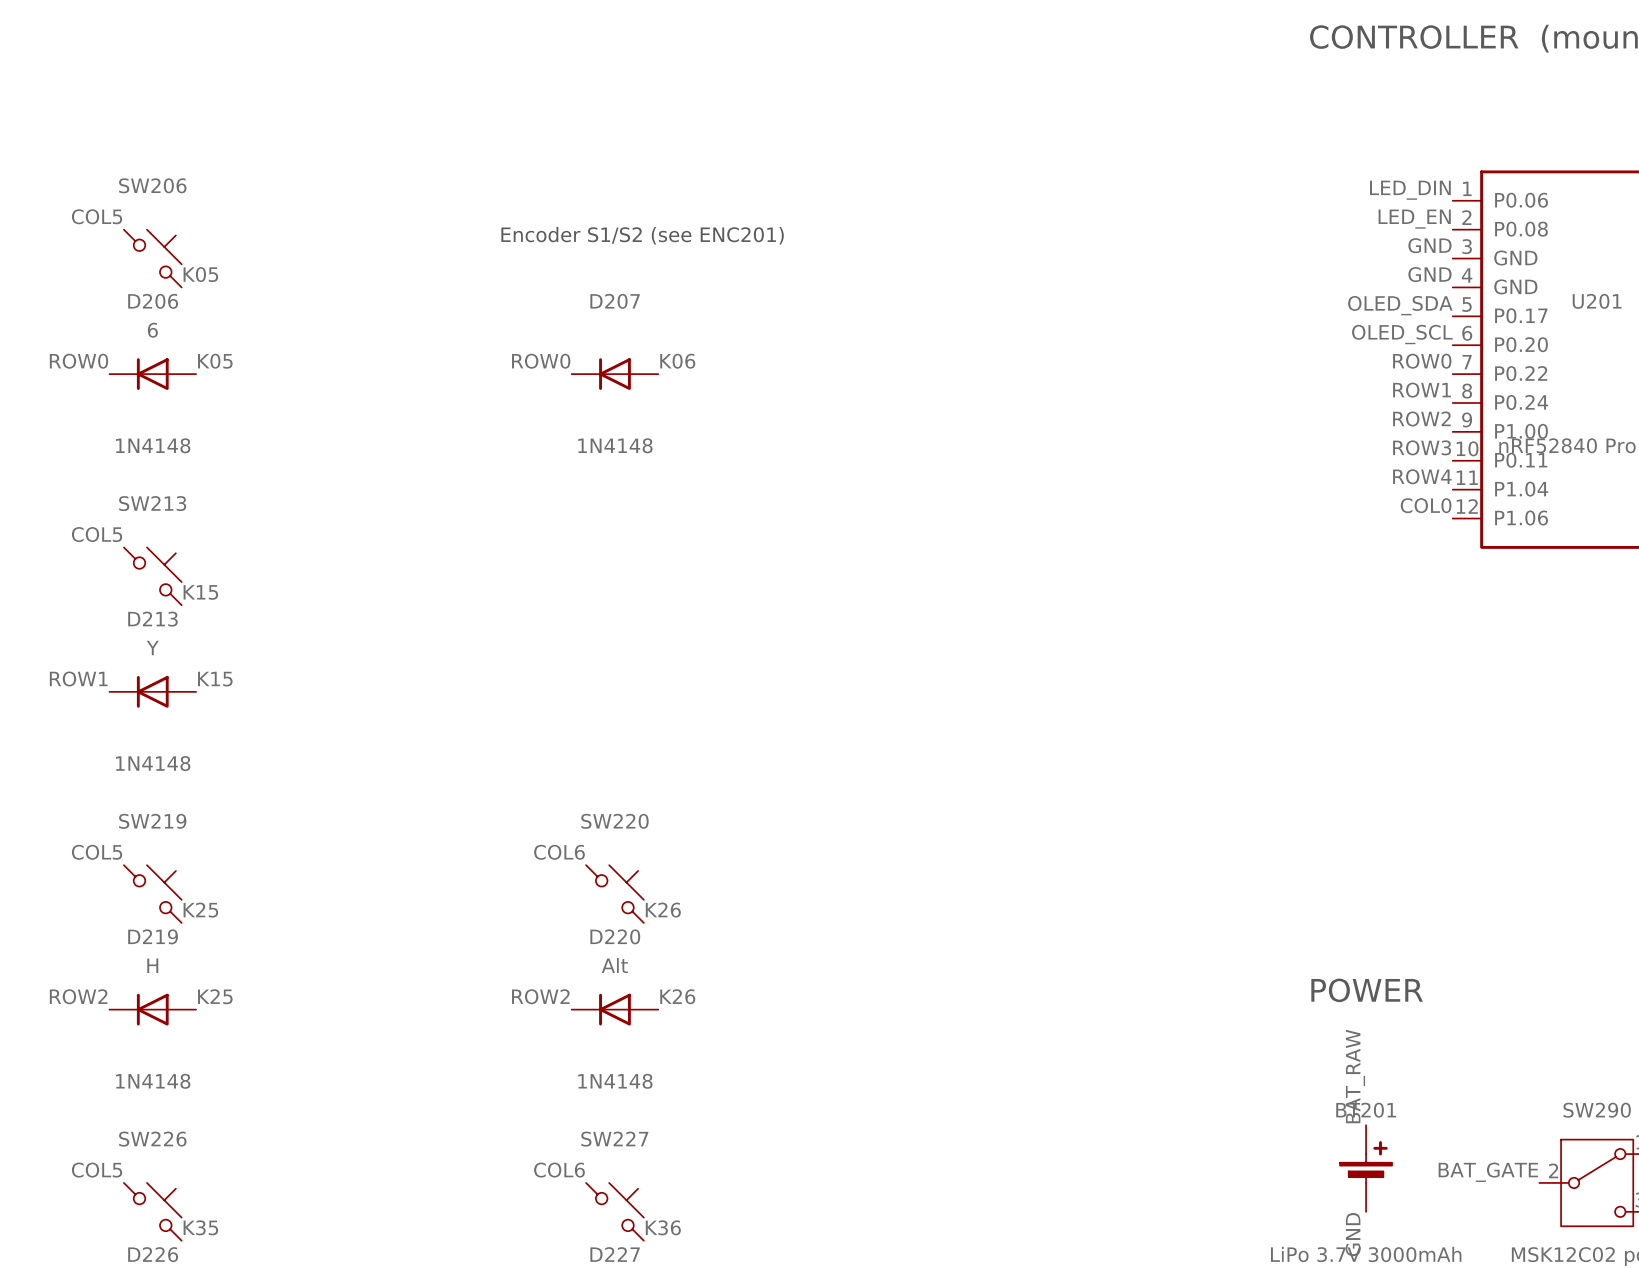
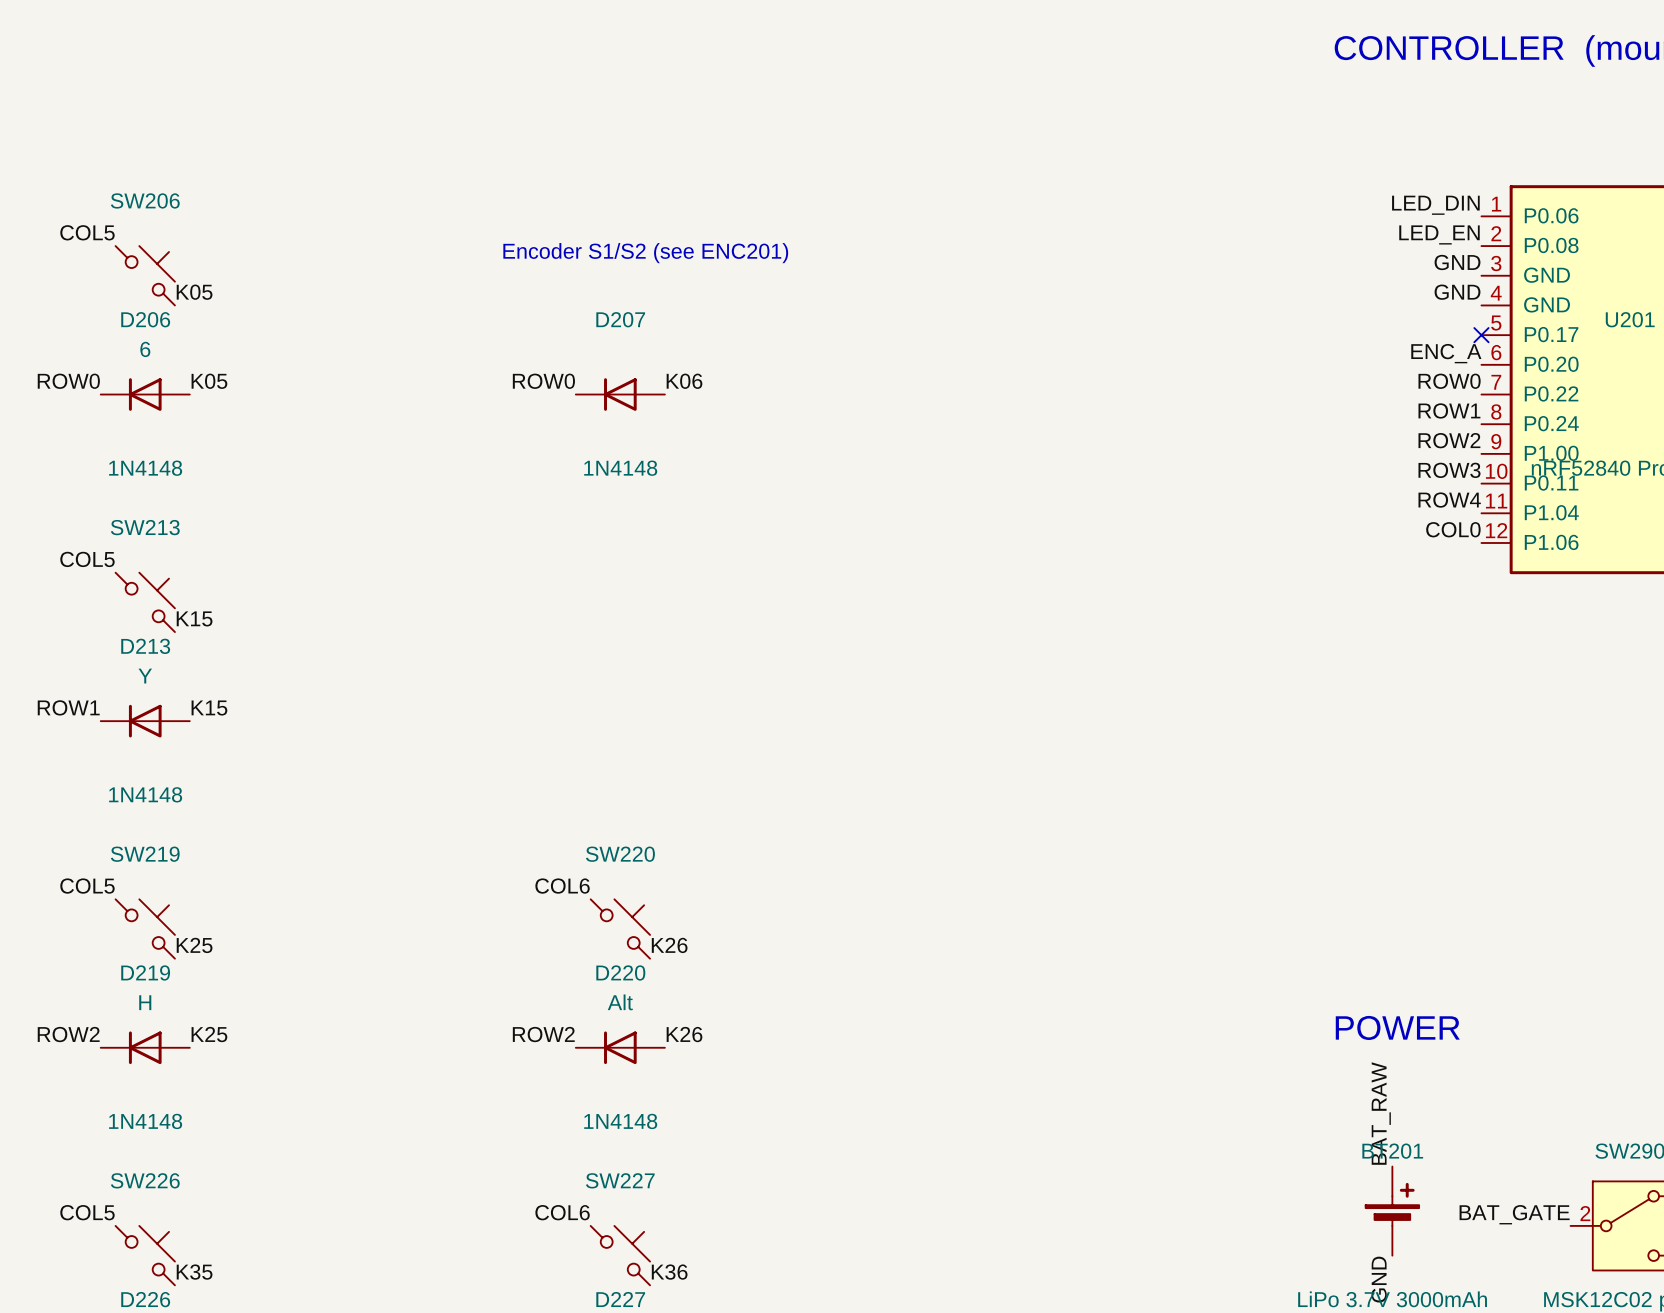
label: OLED_SDA (1400, 305) -> none
no-connect mark: none -> (1481, 335)
label: OLED_SCL (1402, 334) -> ENC_A (1446, 353)

